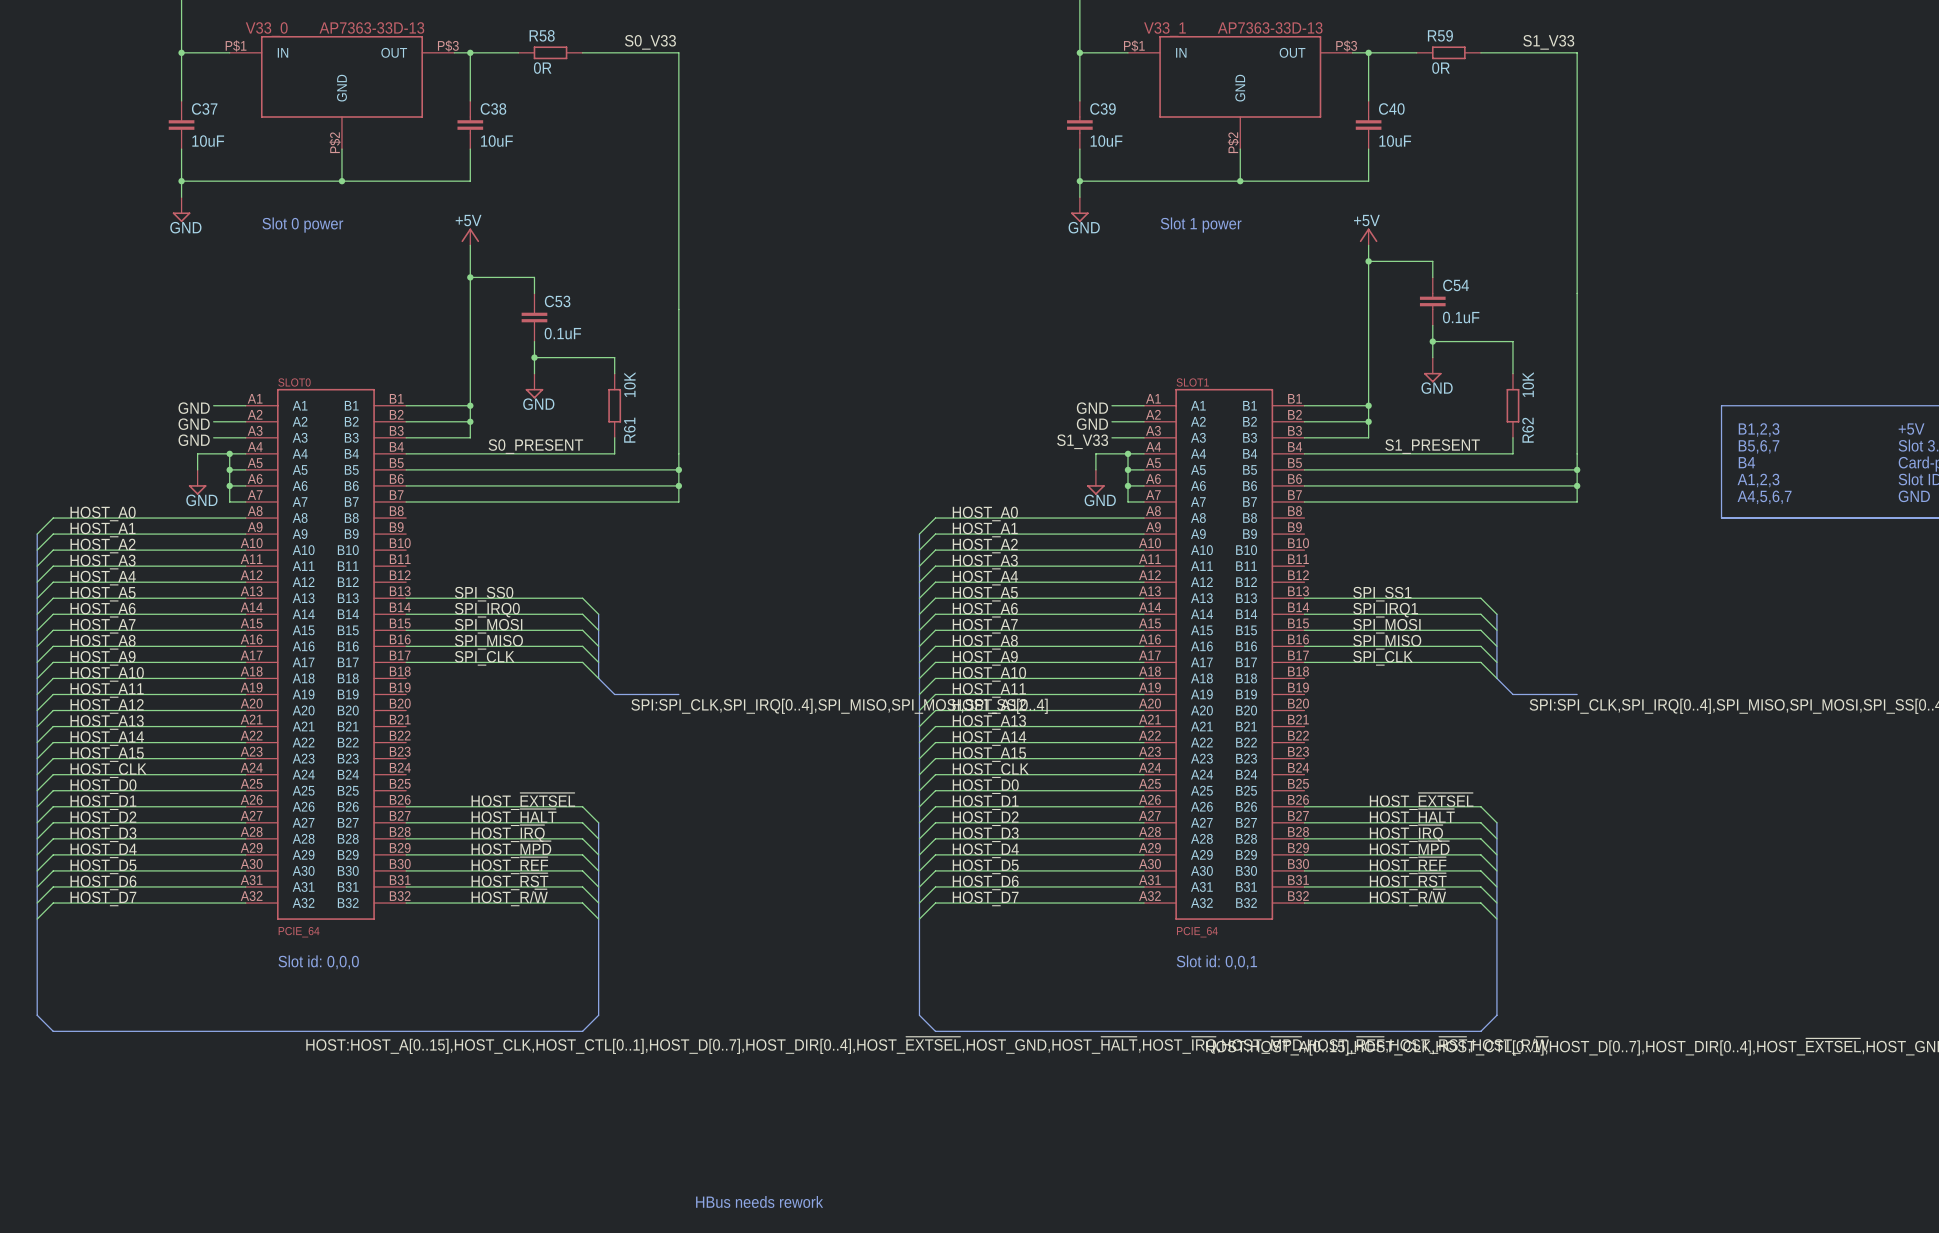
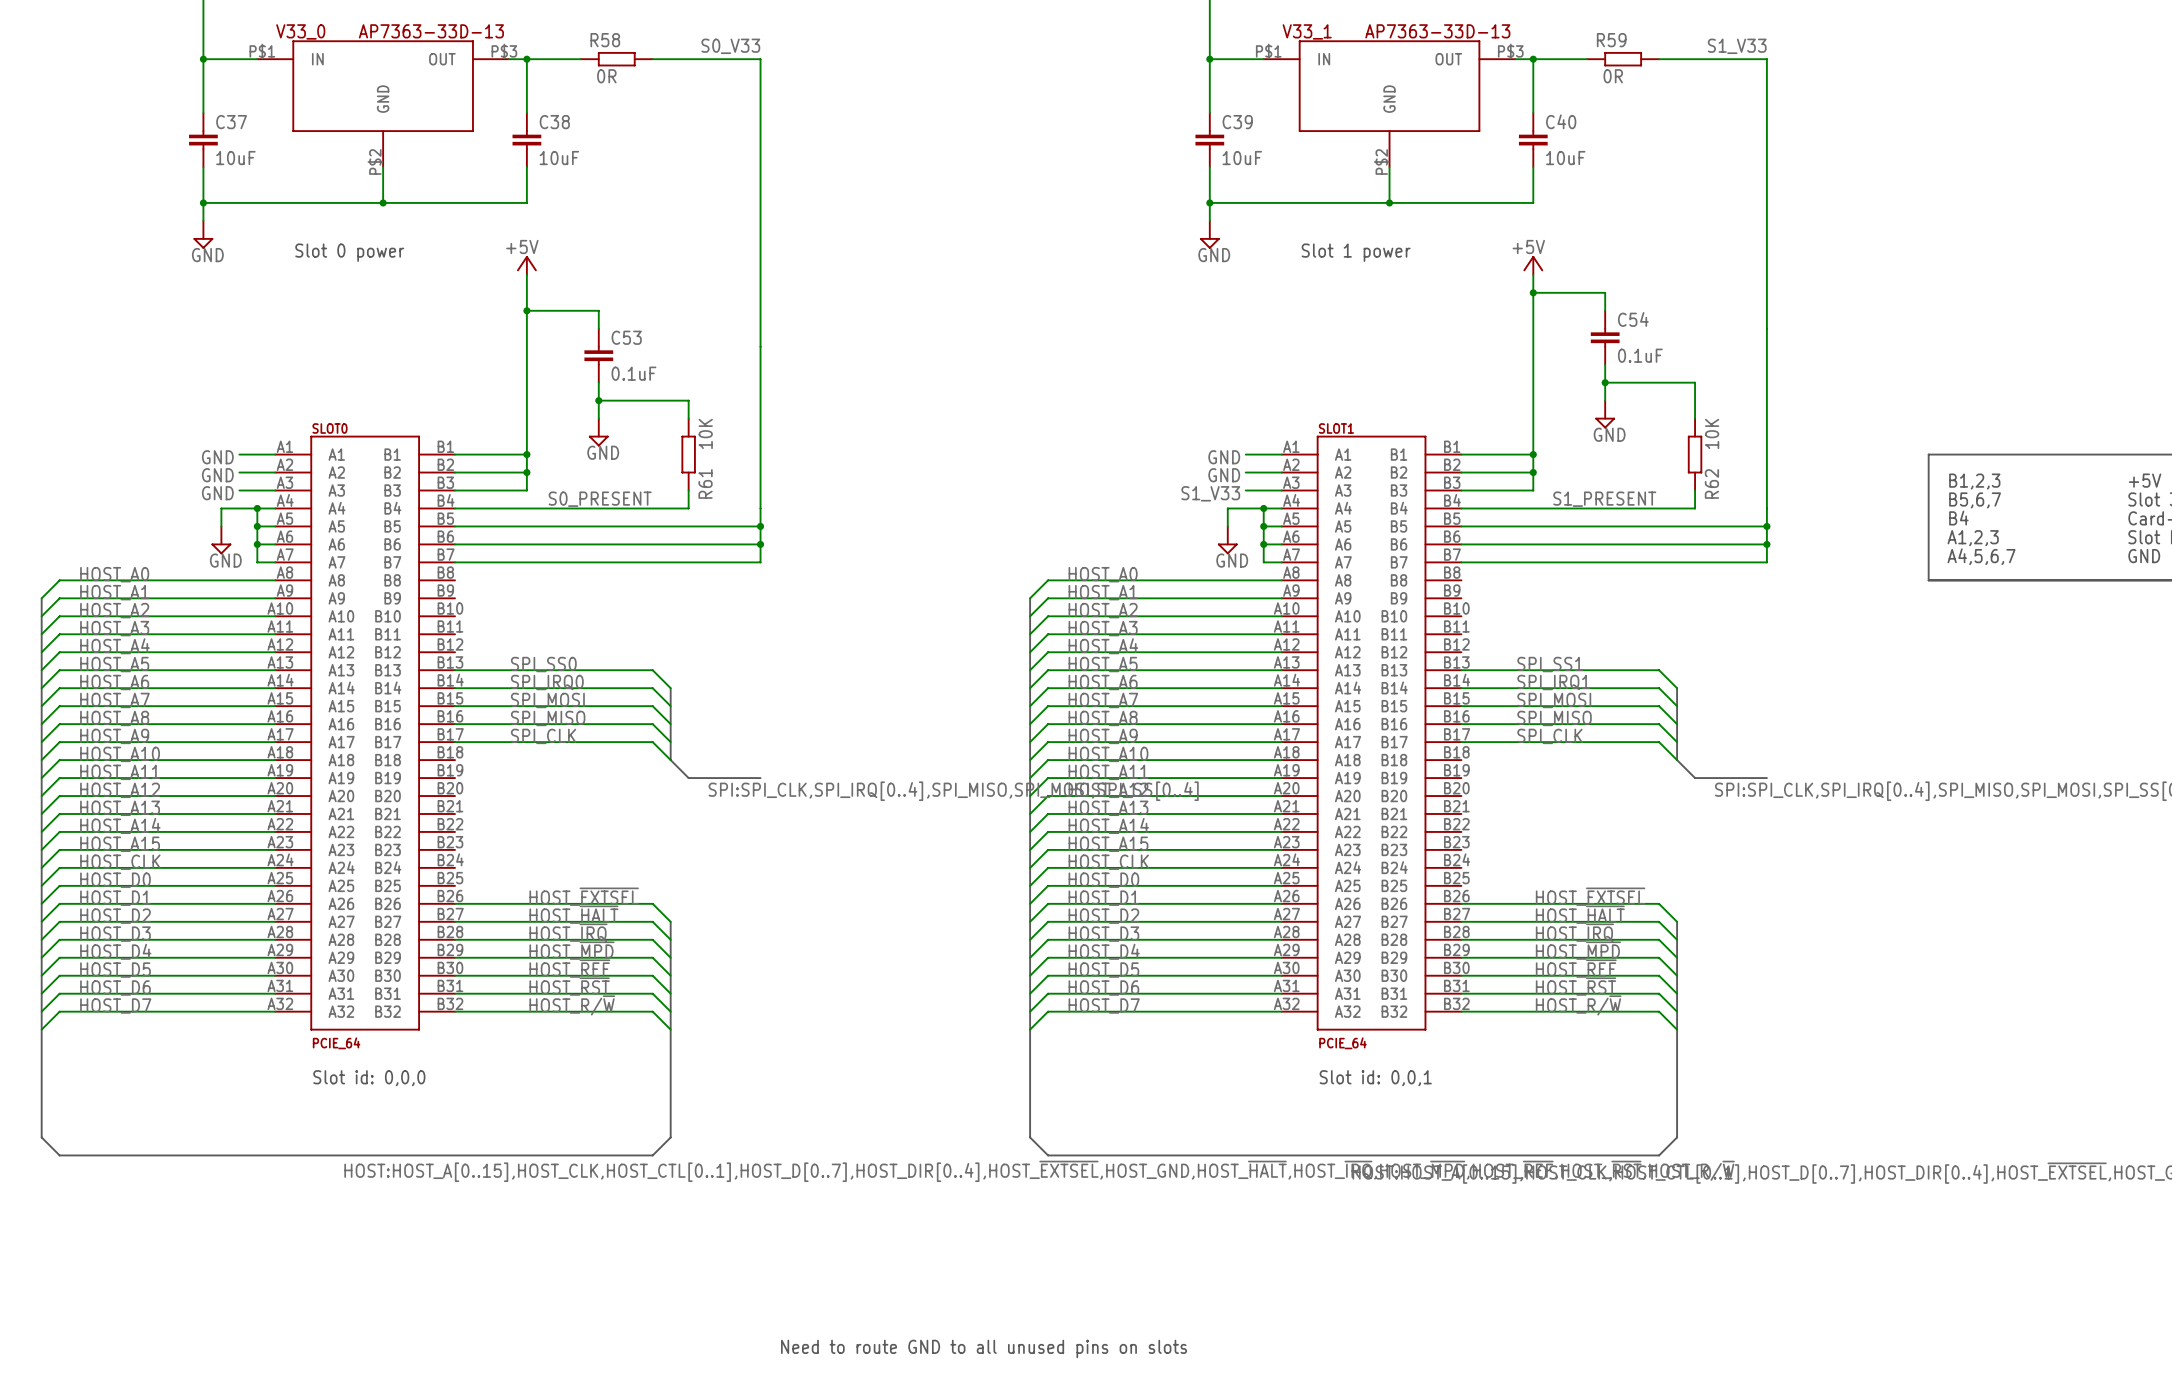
text: HBus needs rework (759, 1201) -> Need to route GND to all unused pins on slots (984, 1348)

